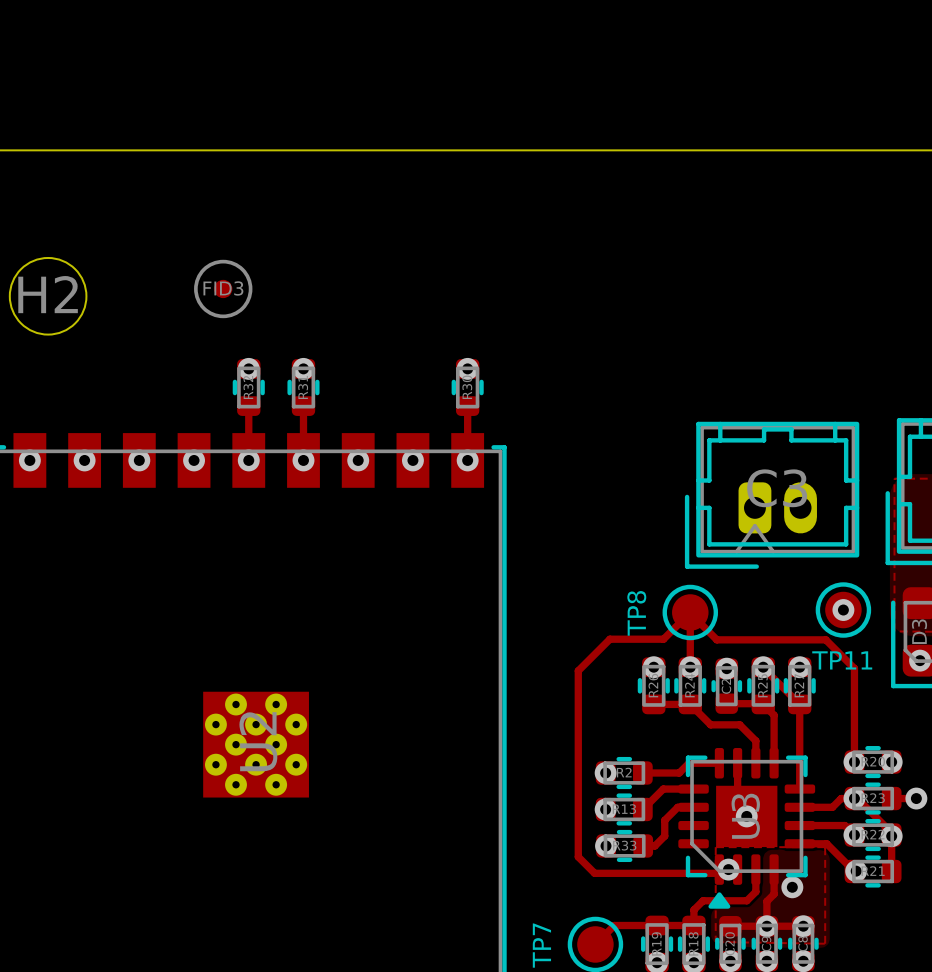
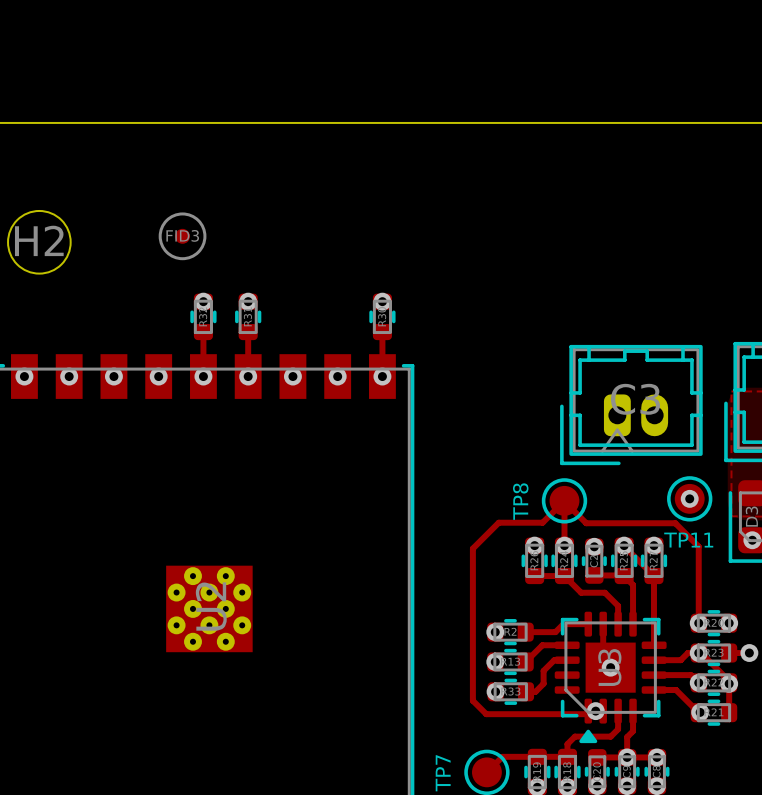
zone outline: (715, 847) (715, 942) (825, 943) (825, 847) (715, 847) -> none
via: (792, 887) -> none

